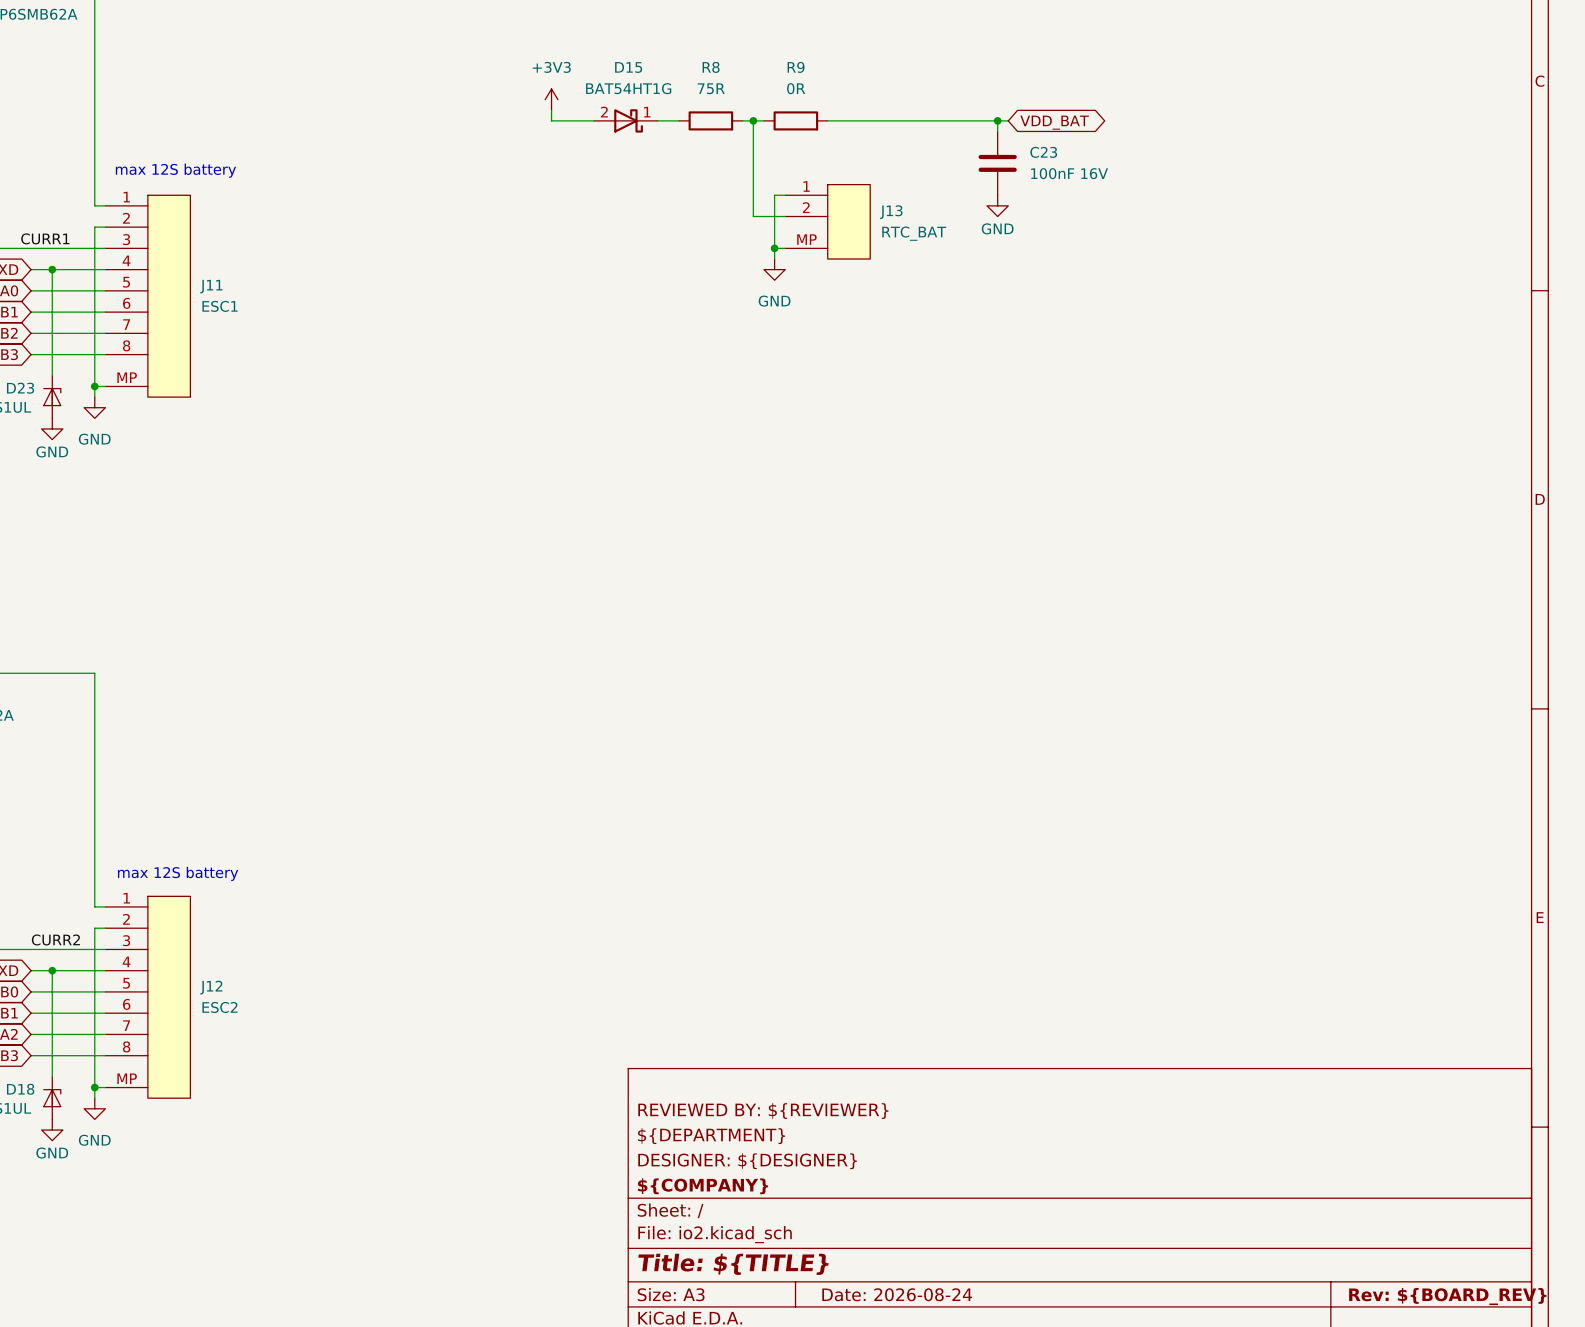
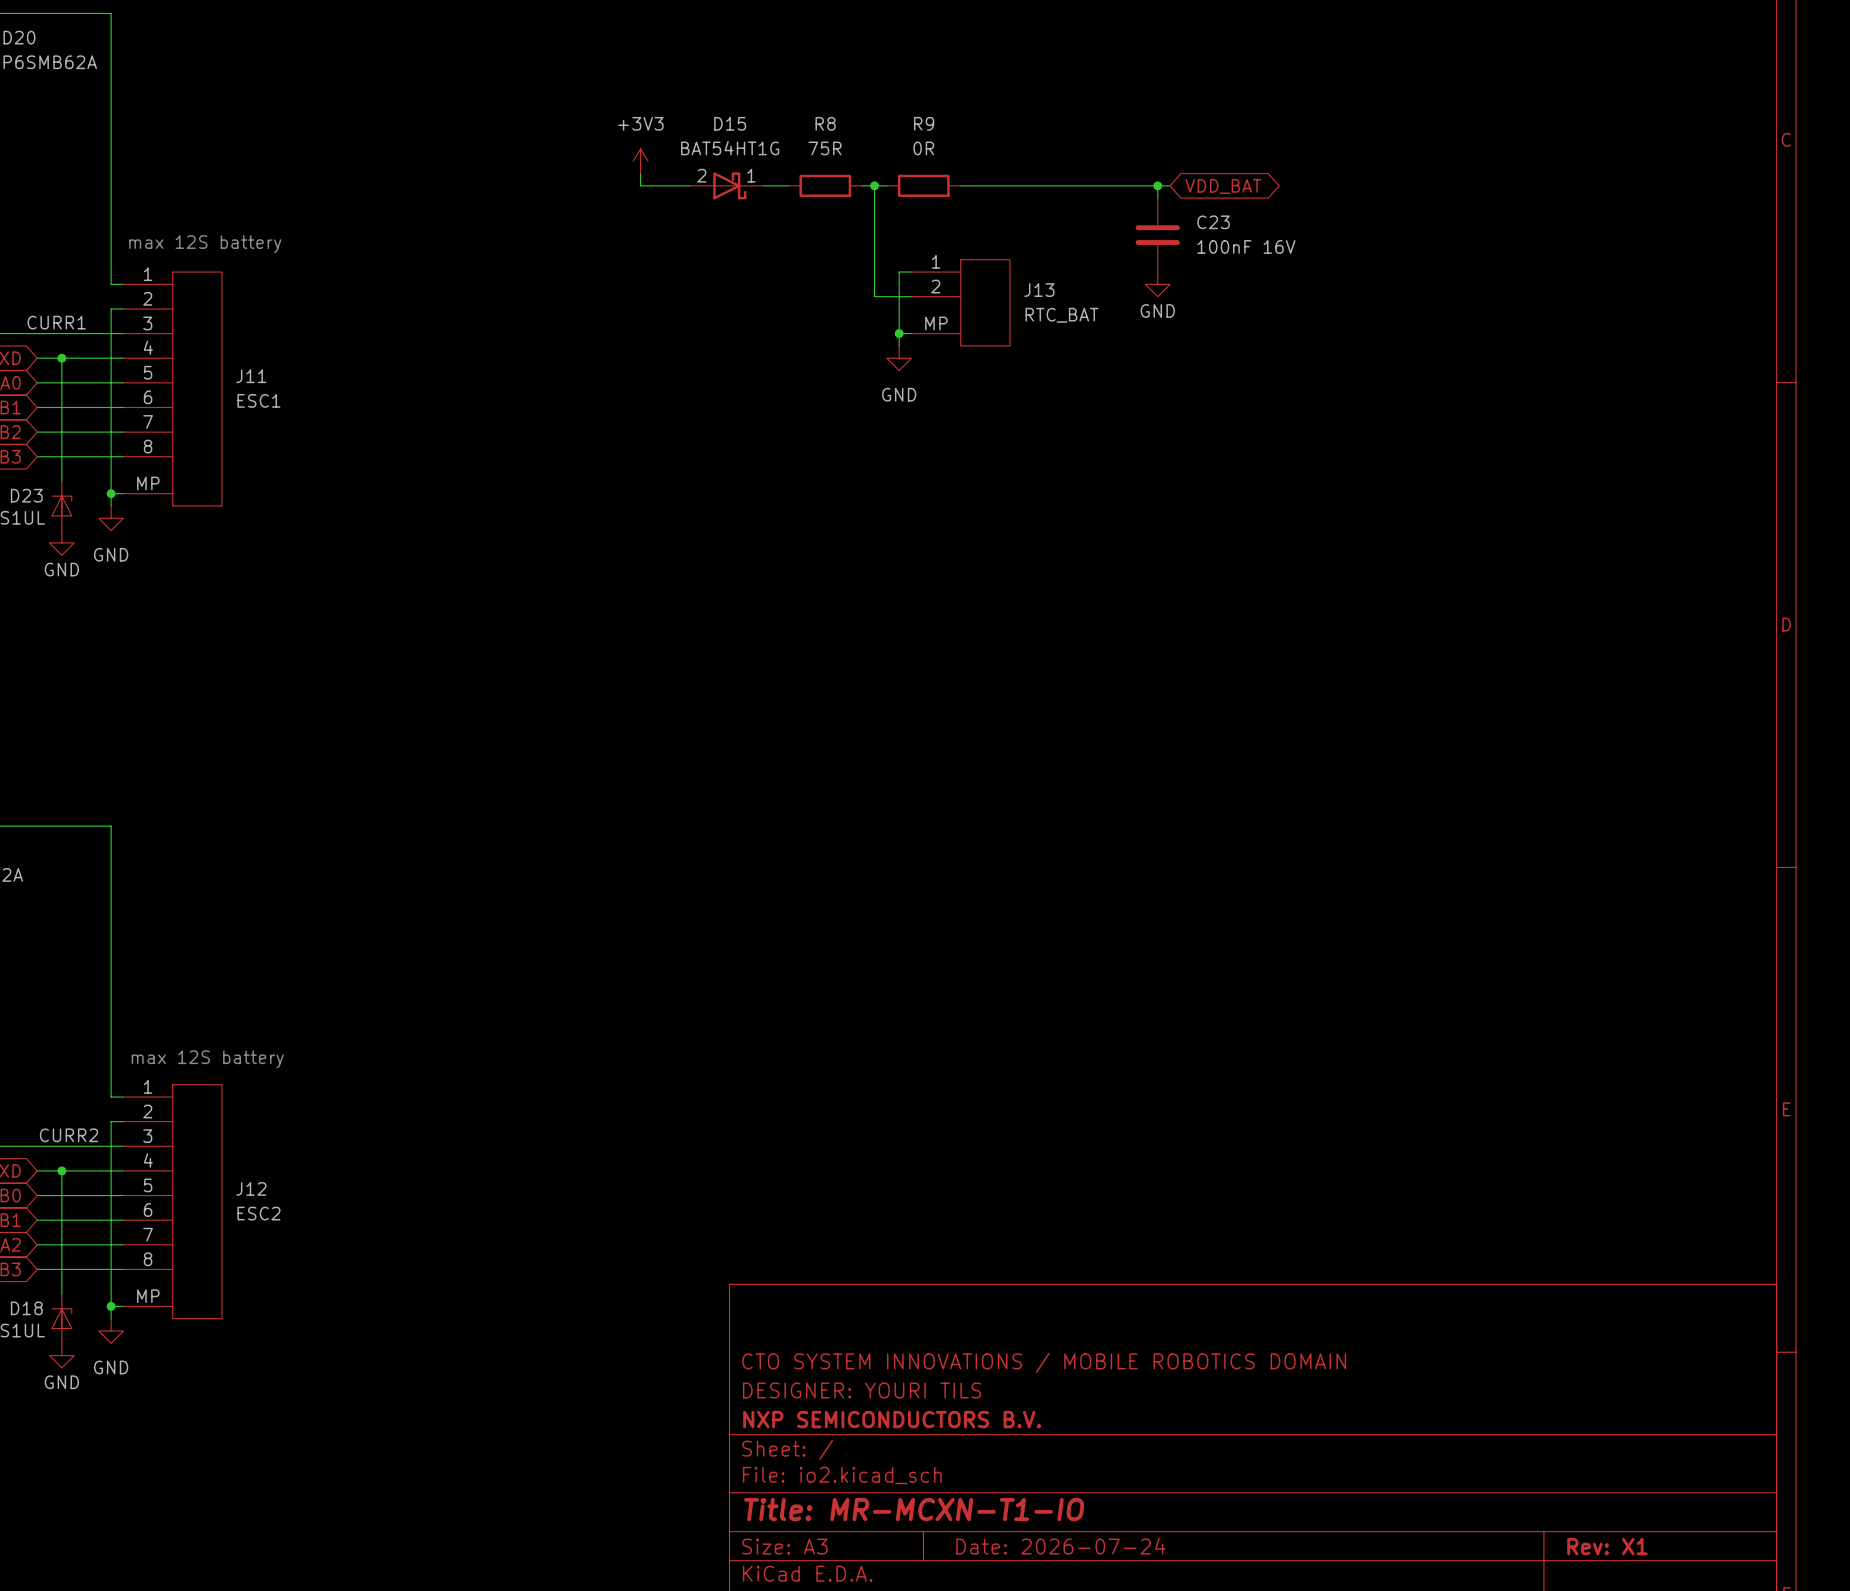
title block: REVIEWED BY: ${REVIEWER} (763, 1111) -> none
title block: ${DEPARTMENT} (711, 1136) -> CTO SYSTEM INNOVATIONS / MOBILE ROBOTICS DOMAIN (1044, 1362)
title block: DESIGNER: ${DESIGNER} (747, 1161) -> DESIGNER: YOURI TILS (862, 1390)
title block: ${COMPANY} (703, 1186) -> NXP SEMICONDUCTORS B.V. (892, 1419)
title block: Title: ${TITLE} (733, 1264) -> Title: MR-MCXN-T1-IO (914, 1509)
title block: Date: 2026-08-24 (897, 1294) -> Date: 2026-07-24 (1060, 1546)
title block: Rev: ${BOARD_REV} (1447, 1296) -> Rev: X1 (1607, 1546)

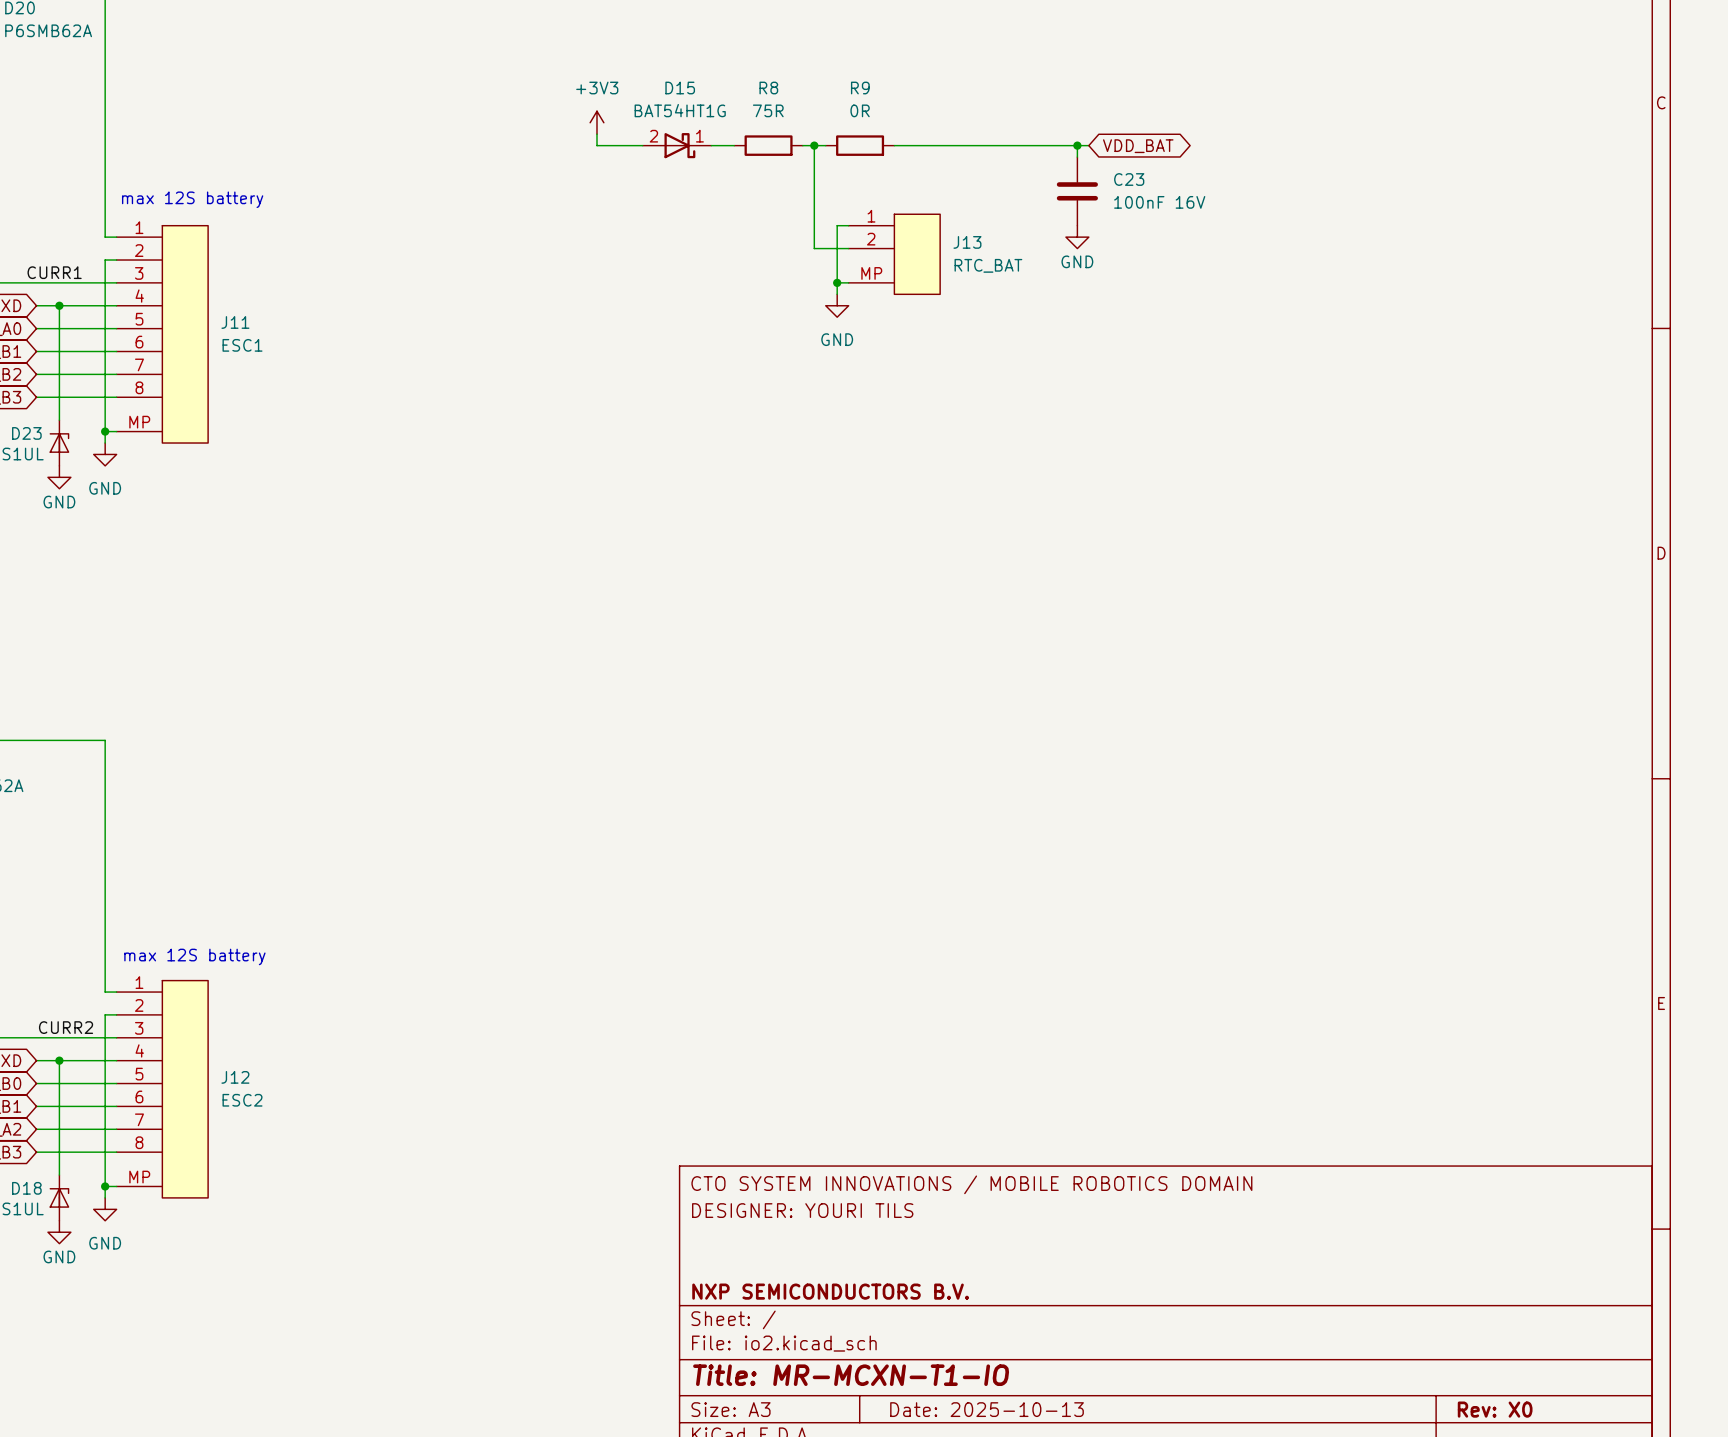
title block position: CTO SYSTEM INNOVATIONS / MOBILE ROBOTICS DOMAIN (1044, 1362) -> CTO SYSTEM INNOVATIONS / MOBILE ROBOTICS DOMAIN (971, 1184)
title block position: DESIGNER: YOURI TILS (862, 1390) -> DESIGNER: YOURI TILS (802, 1210)
title block: Date: 2026-07-24 (1060, 1546) -> Date: 2025-10-13 (987, 1409)
title block: Rev: X1 (1607, 1546) -> Rev: X0 (1495, 1409)

